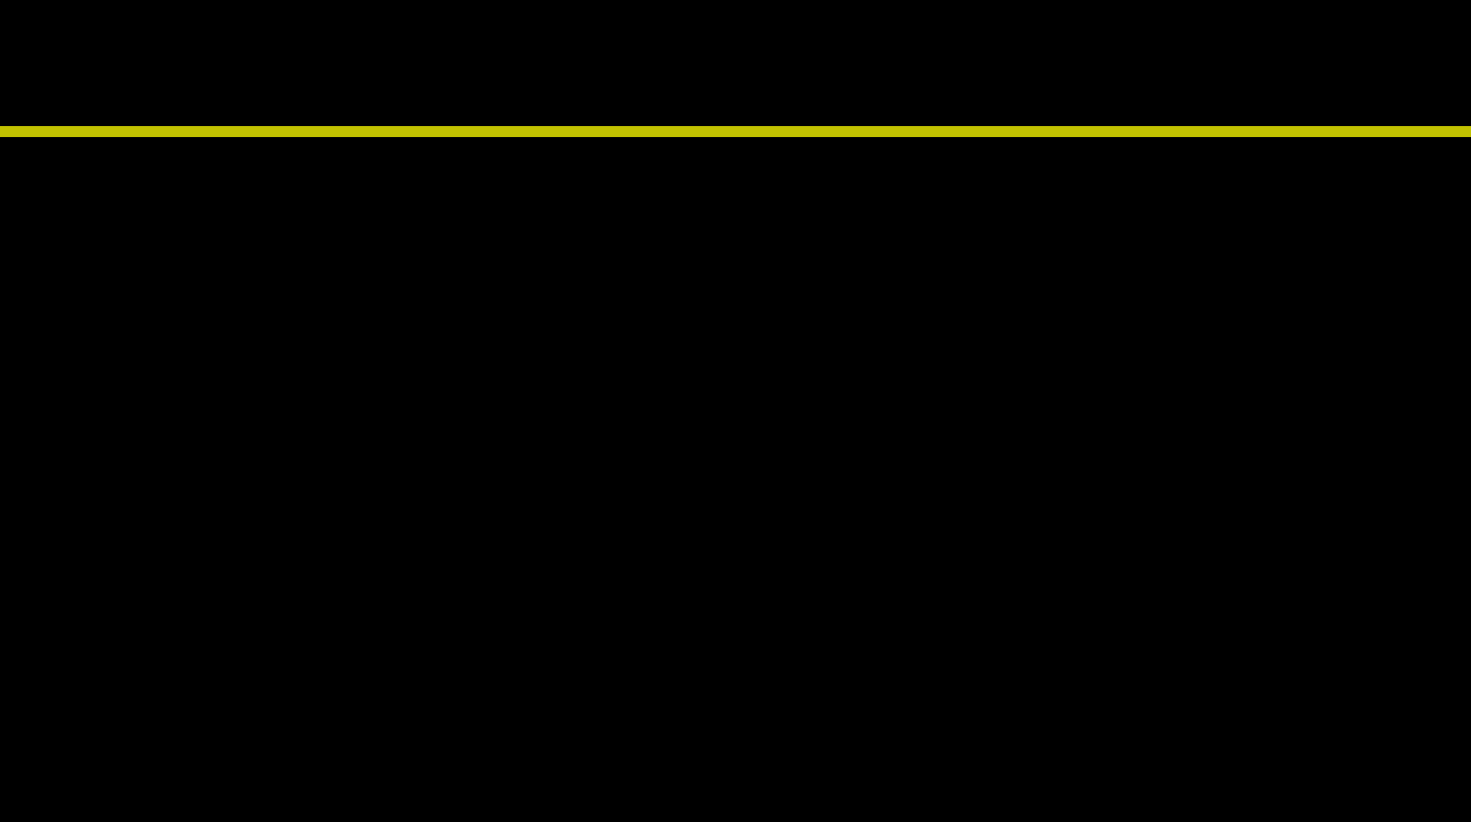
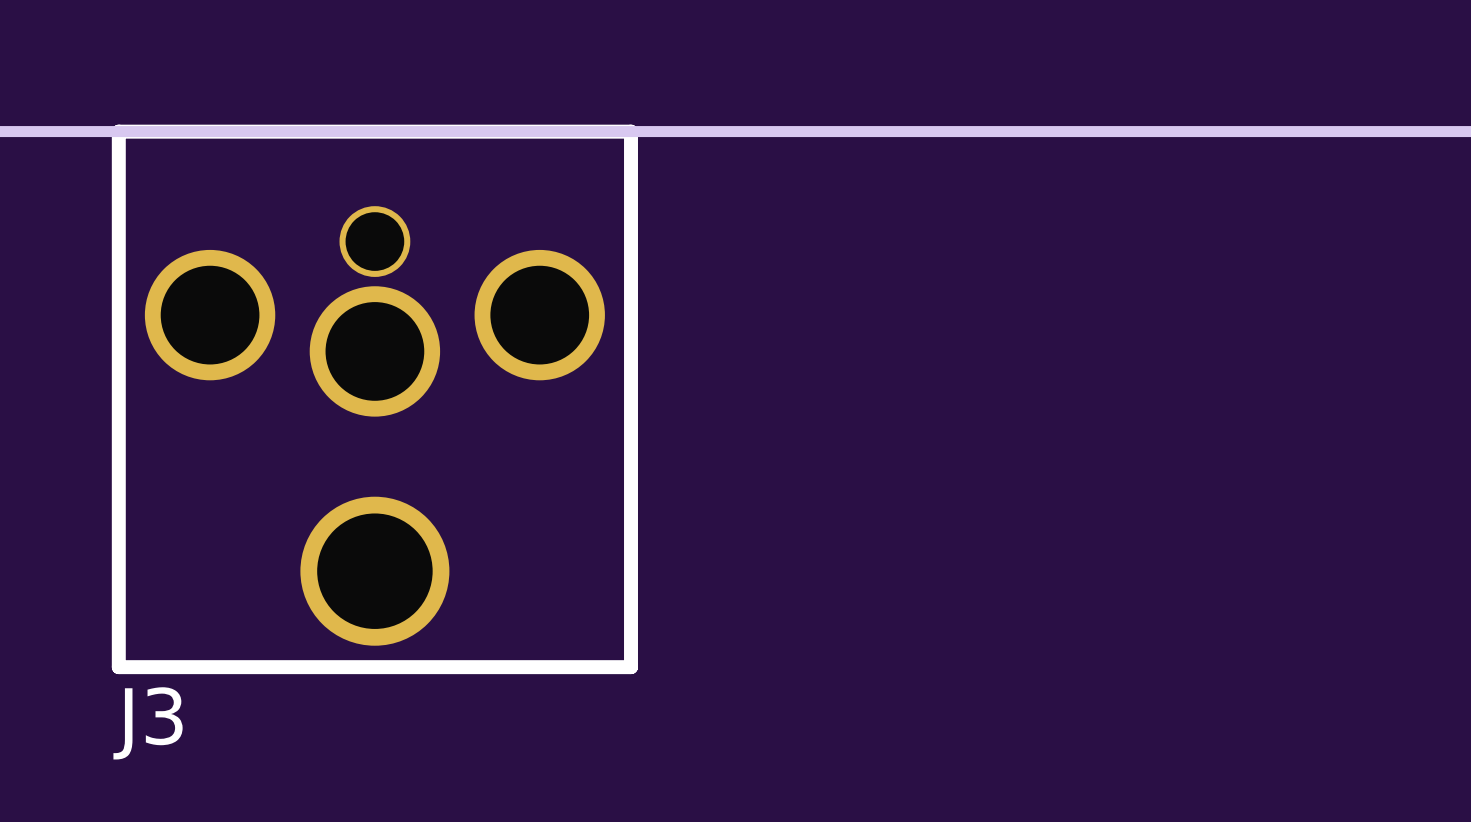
J3: none -> (374, 399)

